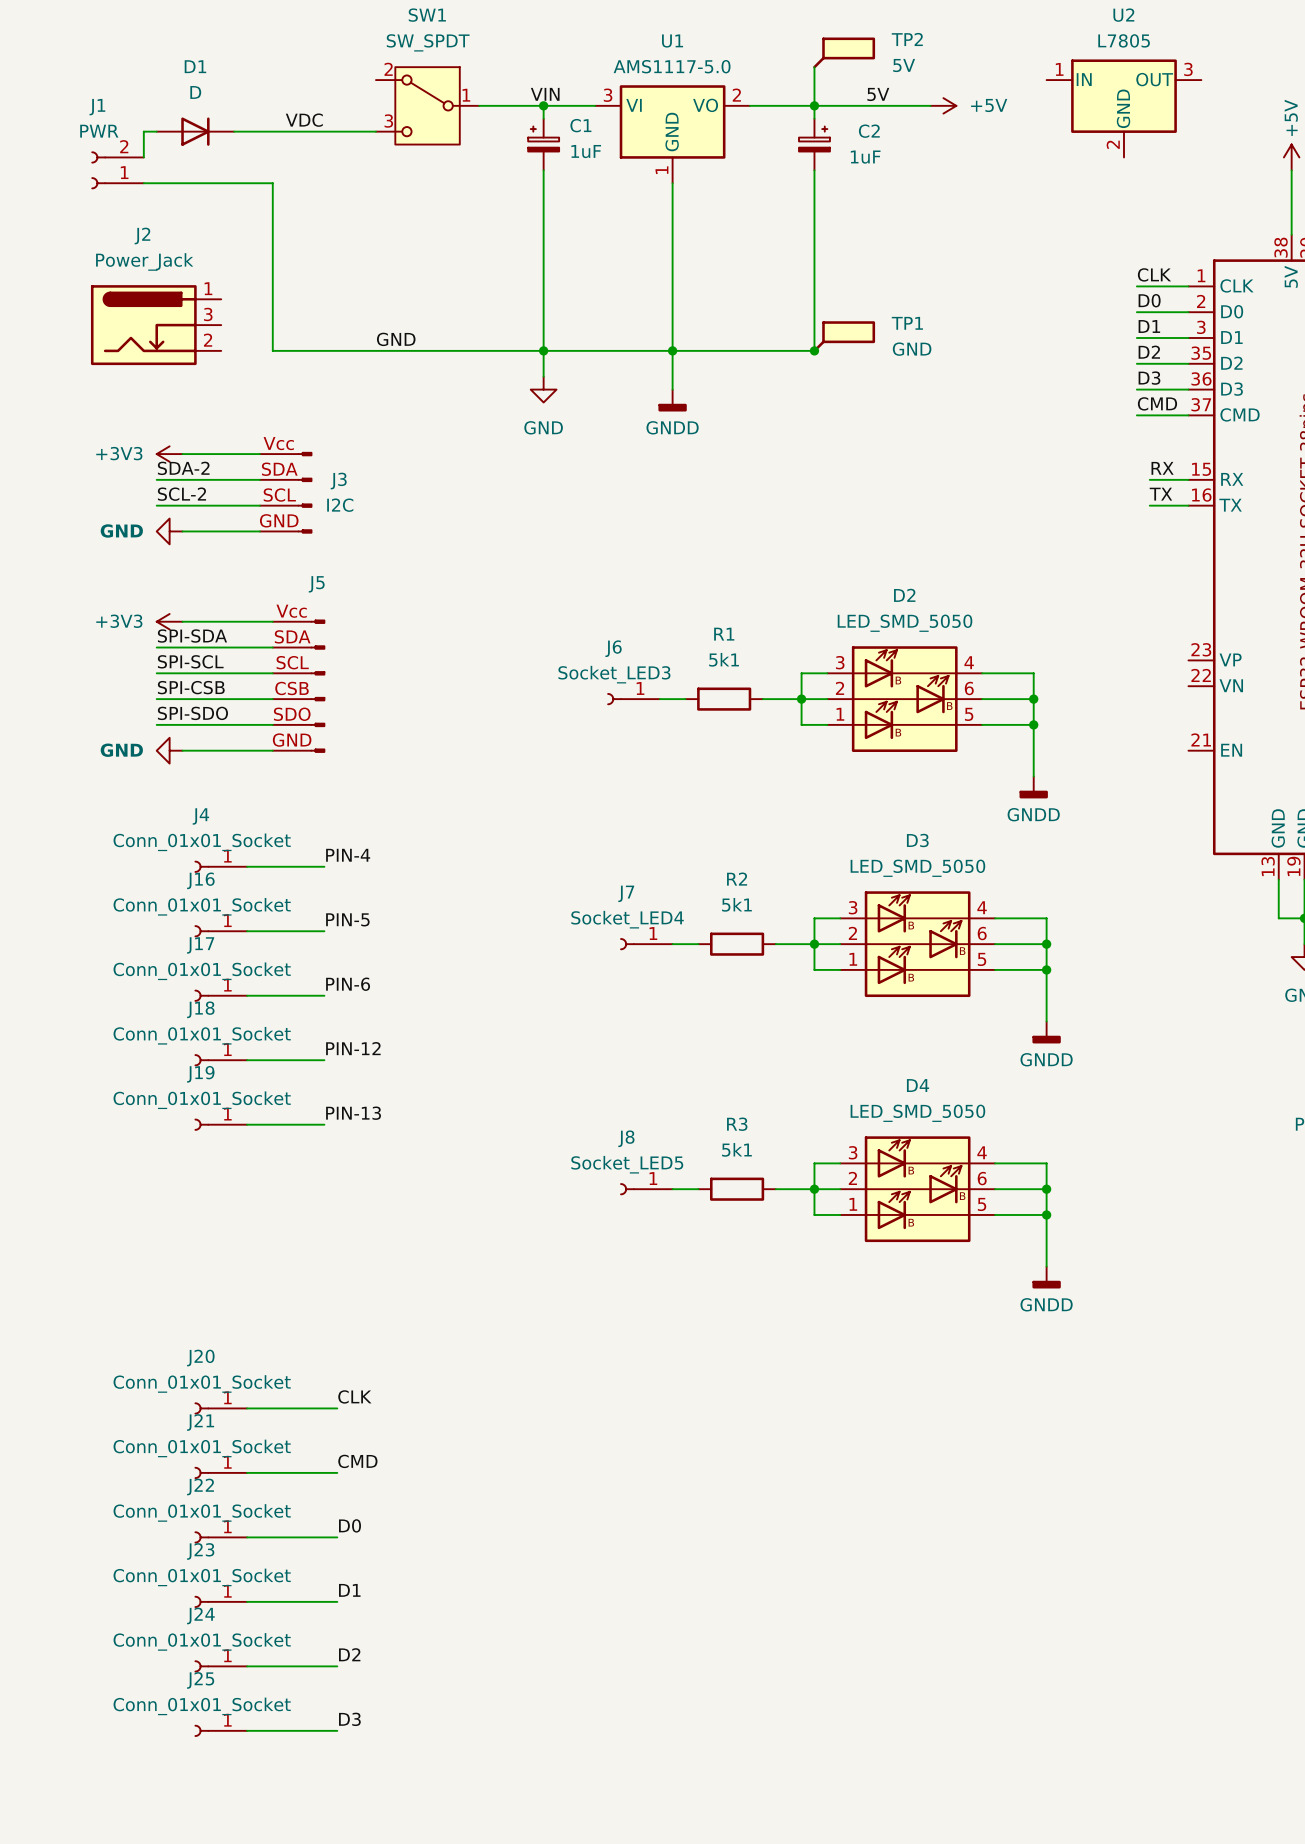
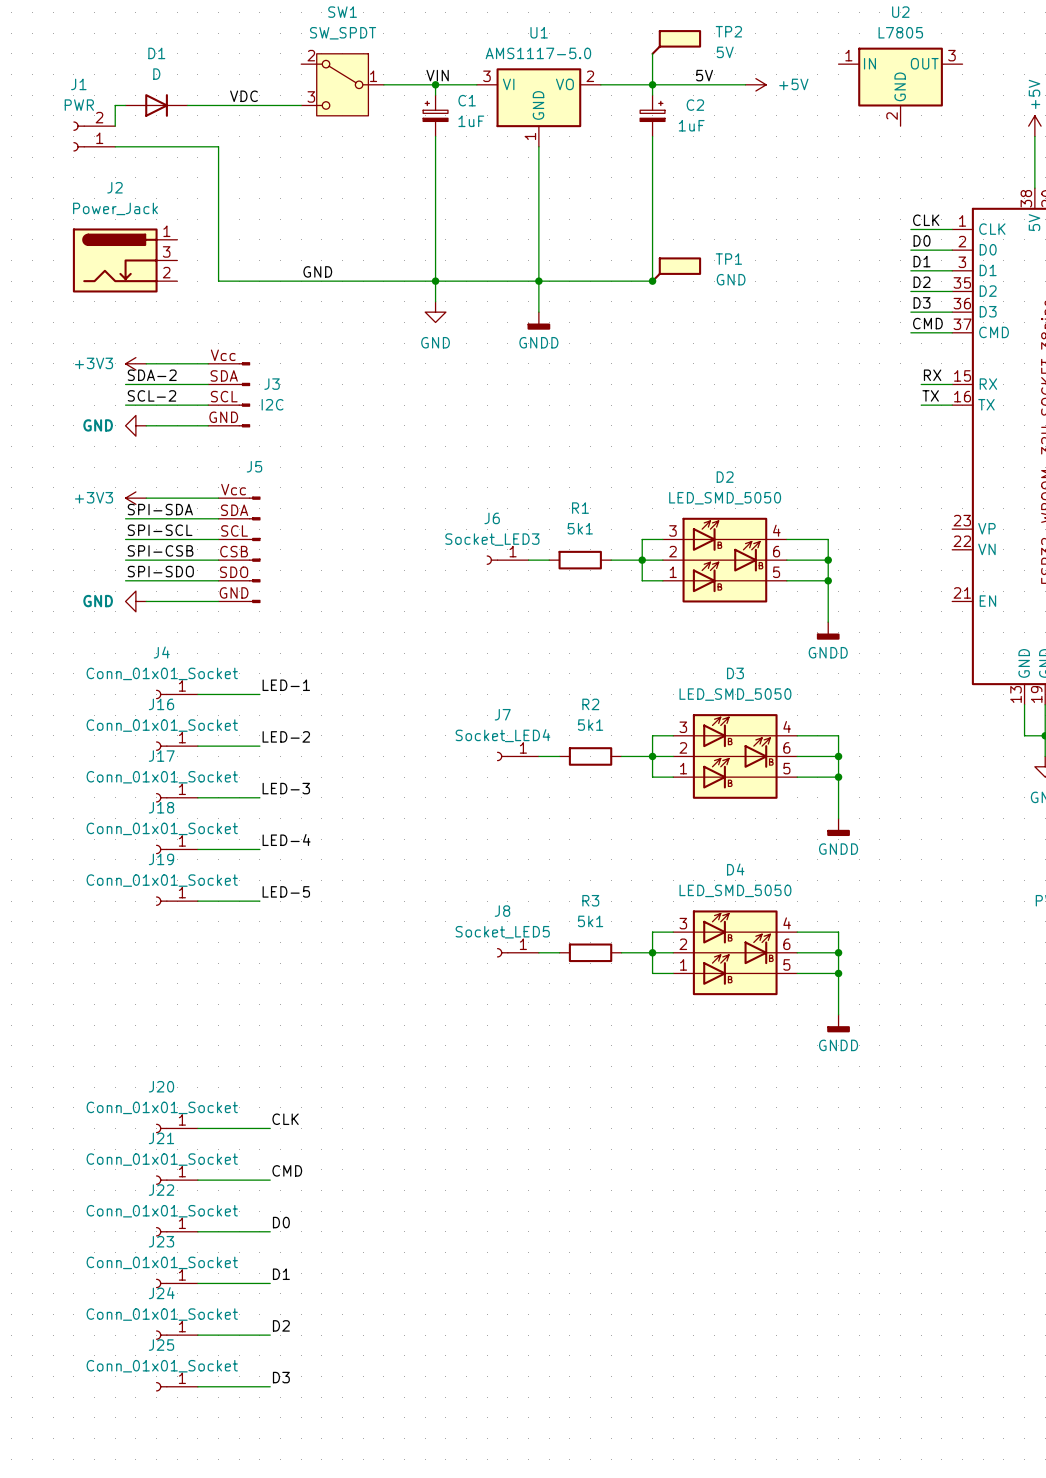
label: PIN-4 (348, 855) -> LED-1 (286, 685)
label: PIN-5 (347, 919) -> LED-2 (286, 736)
label: PIN-6 (348, 984) -> LED-3 (286, 788)
label: PIN-12 (353, 1048) -> LED-4 (286, 839)
label: PIN-13 (353, 1113) -> LED-5 (286, 891)

